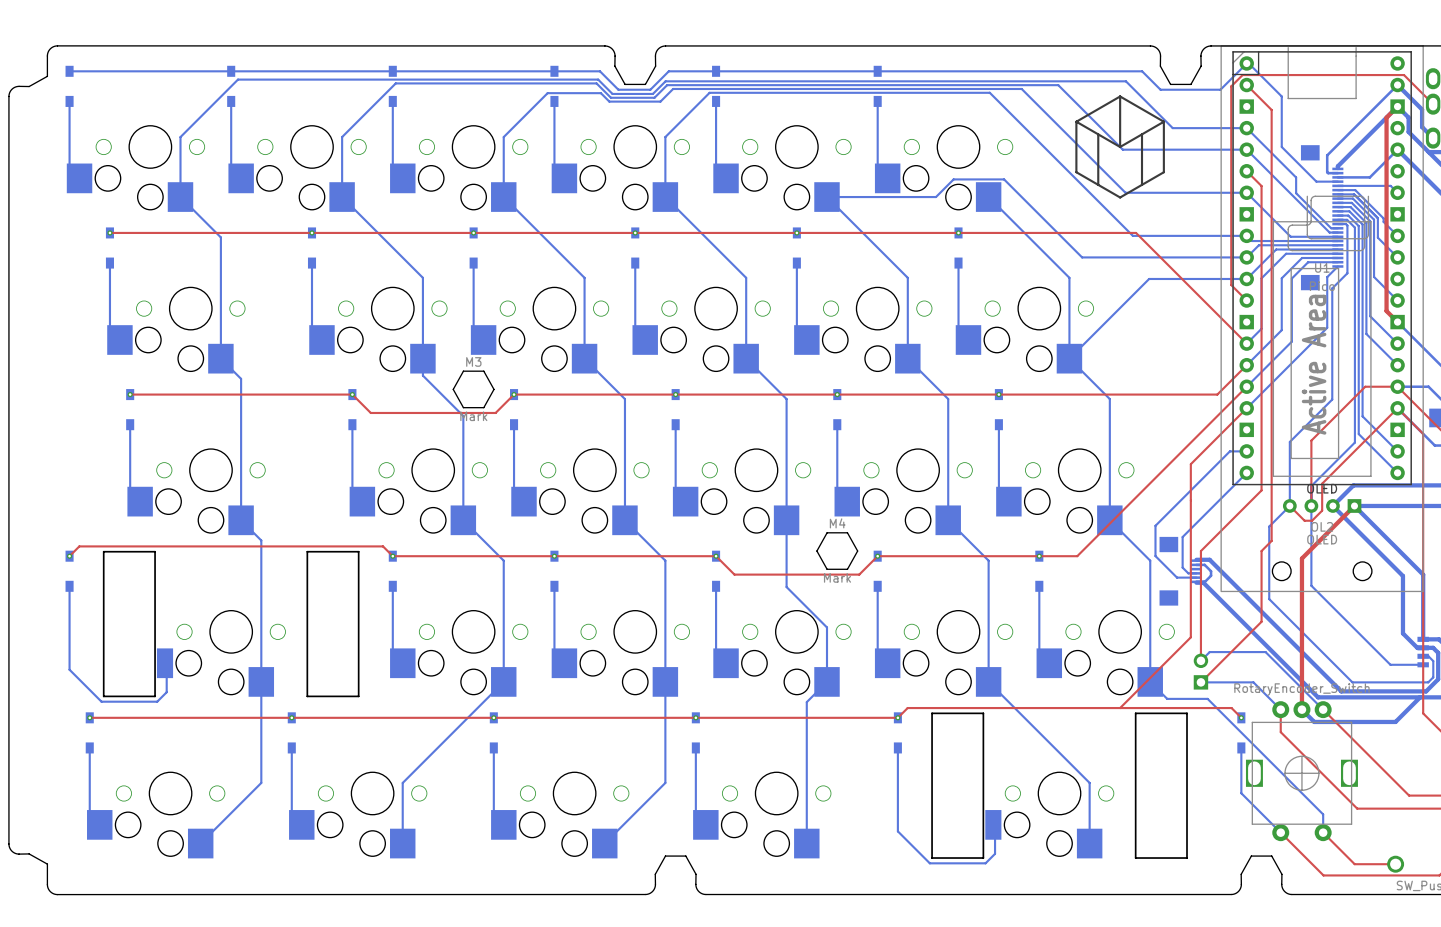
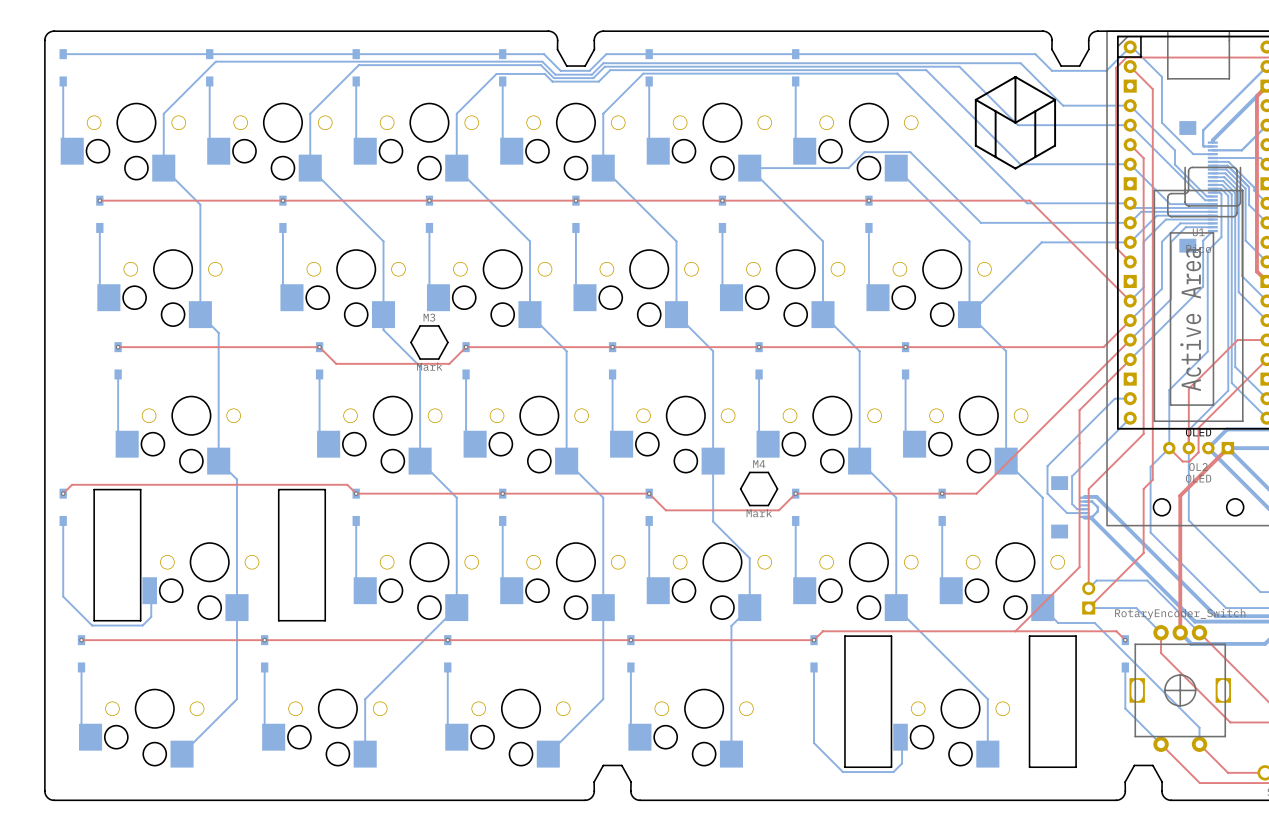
board edge: (604, 45) (56, 45) (50, 48) (47, 53) (47, 76) (29, 86) (16, 86) (11, 90) (8, 96) (8, 844) (10, 849) (14, 853) (29, 853) (47, 864) (47, 887) (50, 891) (56, 894) (645, 894) -> (548, 31) (54, 31) (46, 35) (44, 791) (47, 797) (54, 800) (585, 800)

